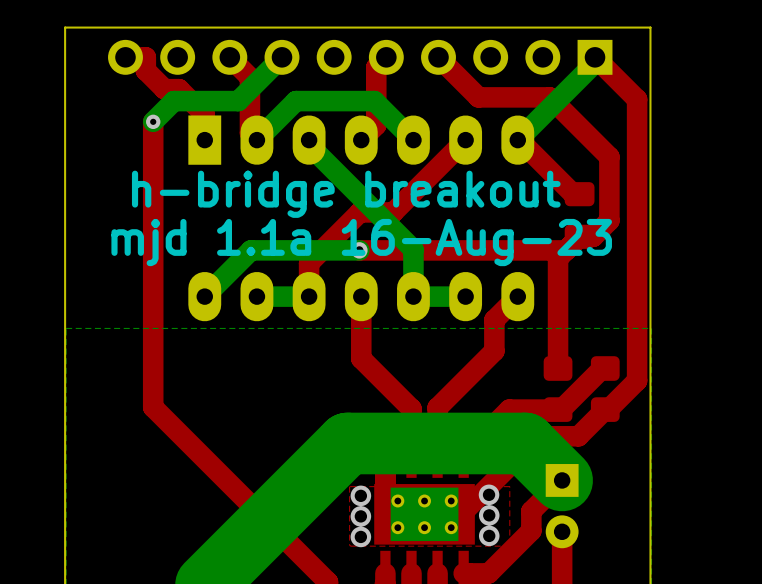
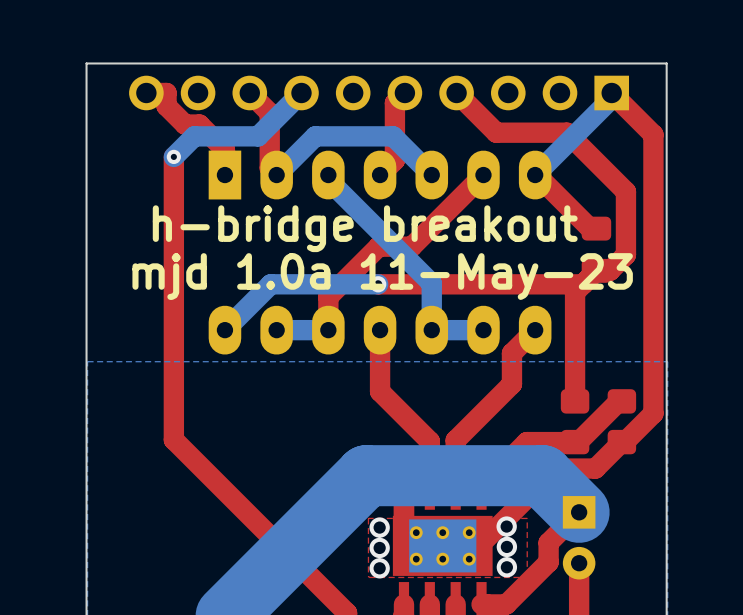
text: mjd 1.1a 16-Aug-23 (361, 242) -> mjd 1.0a 11-May-23 (382, 276)

